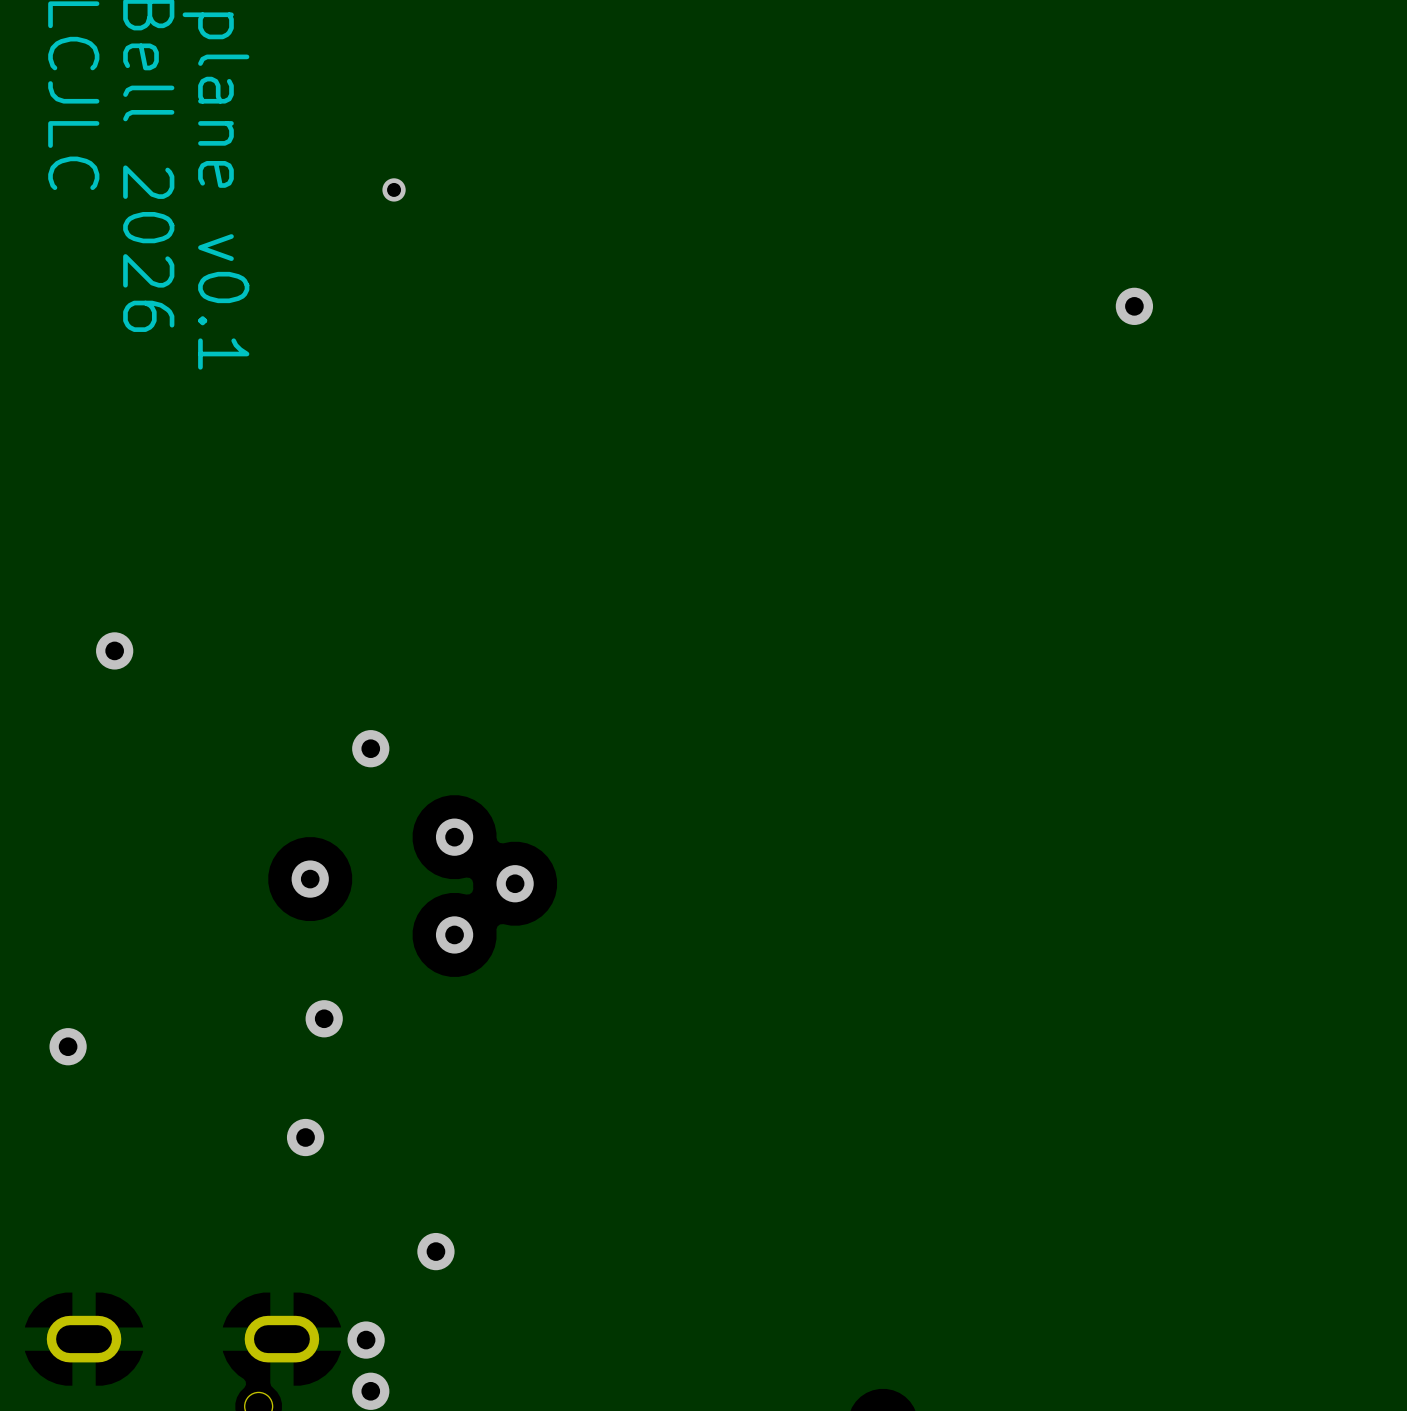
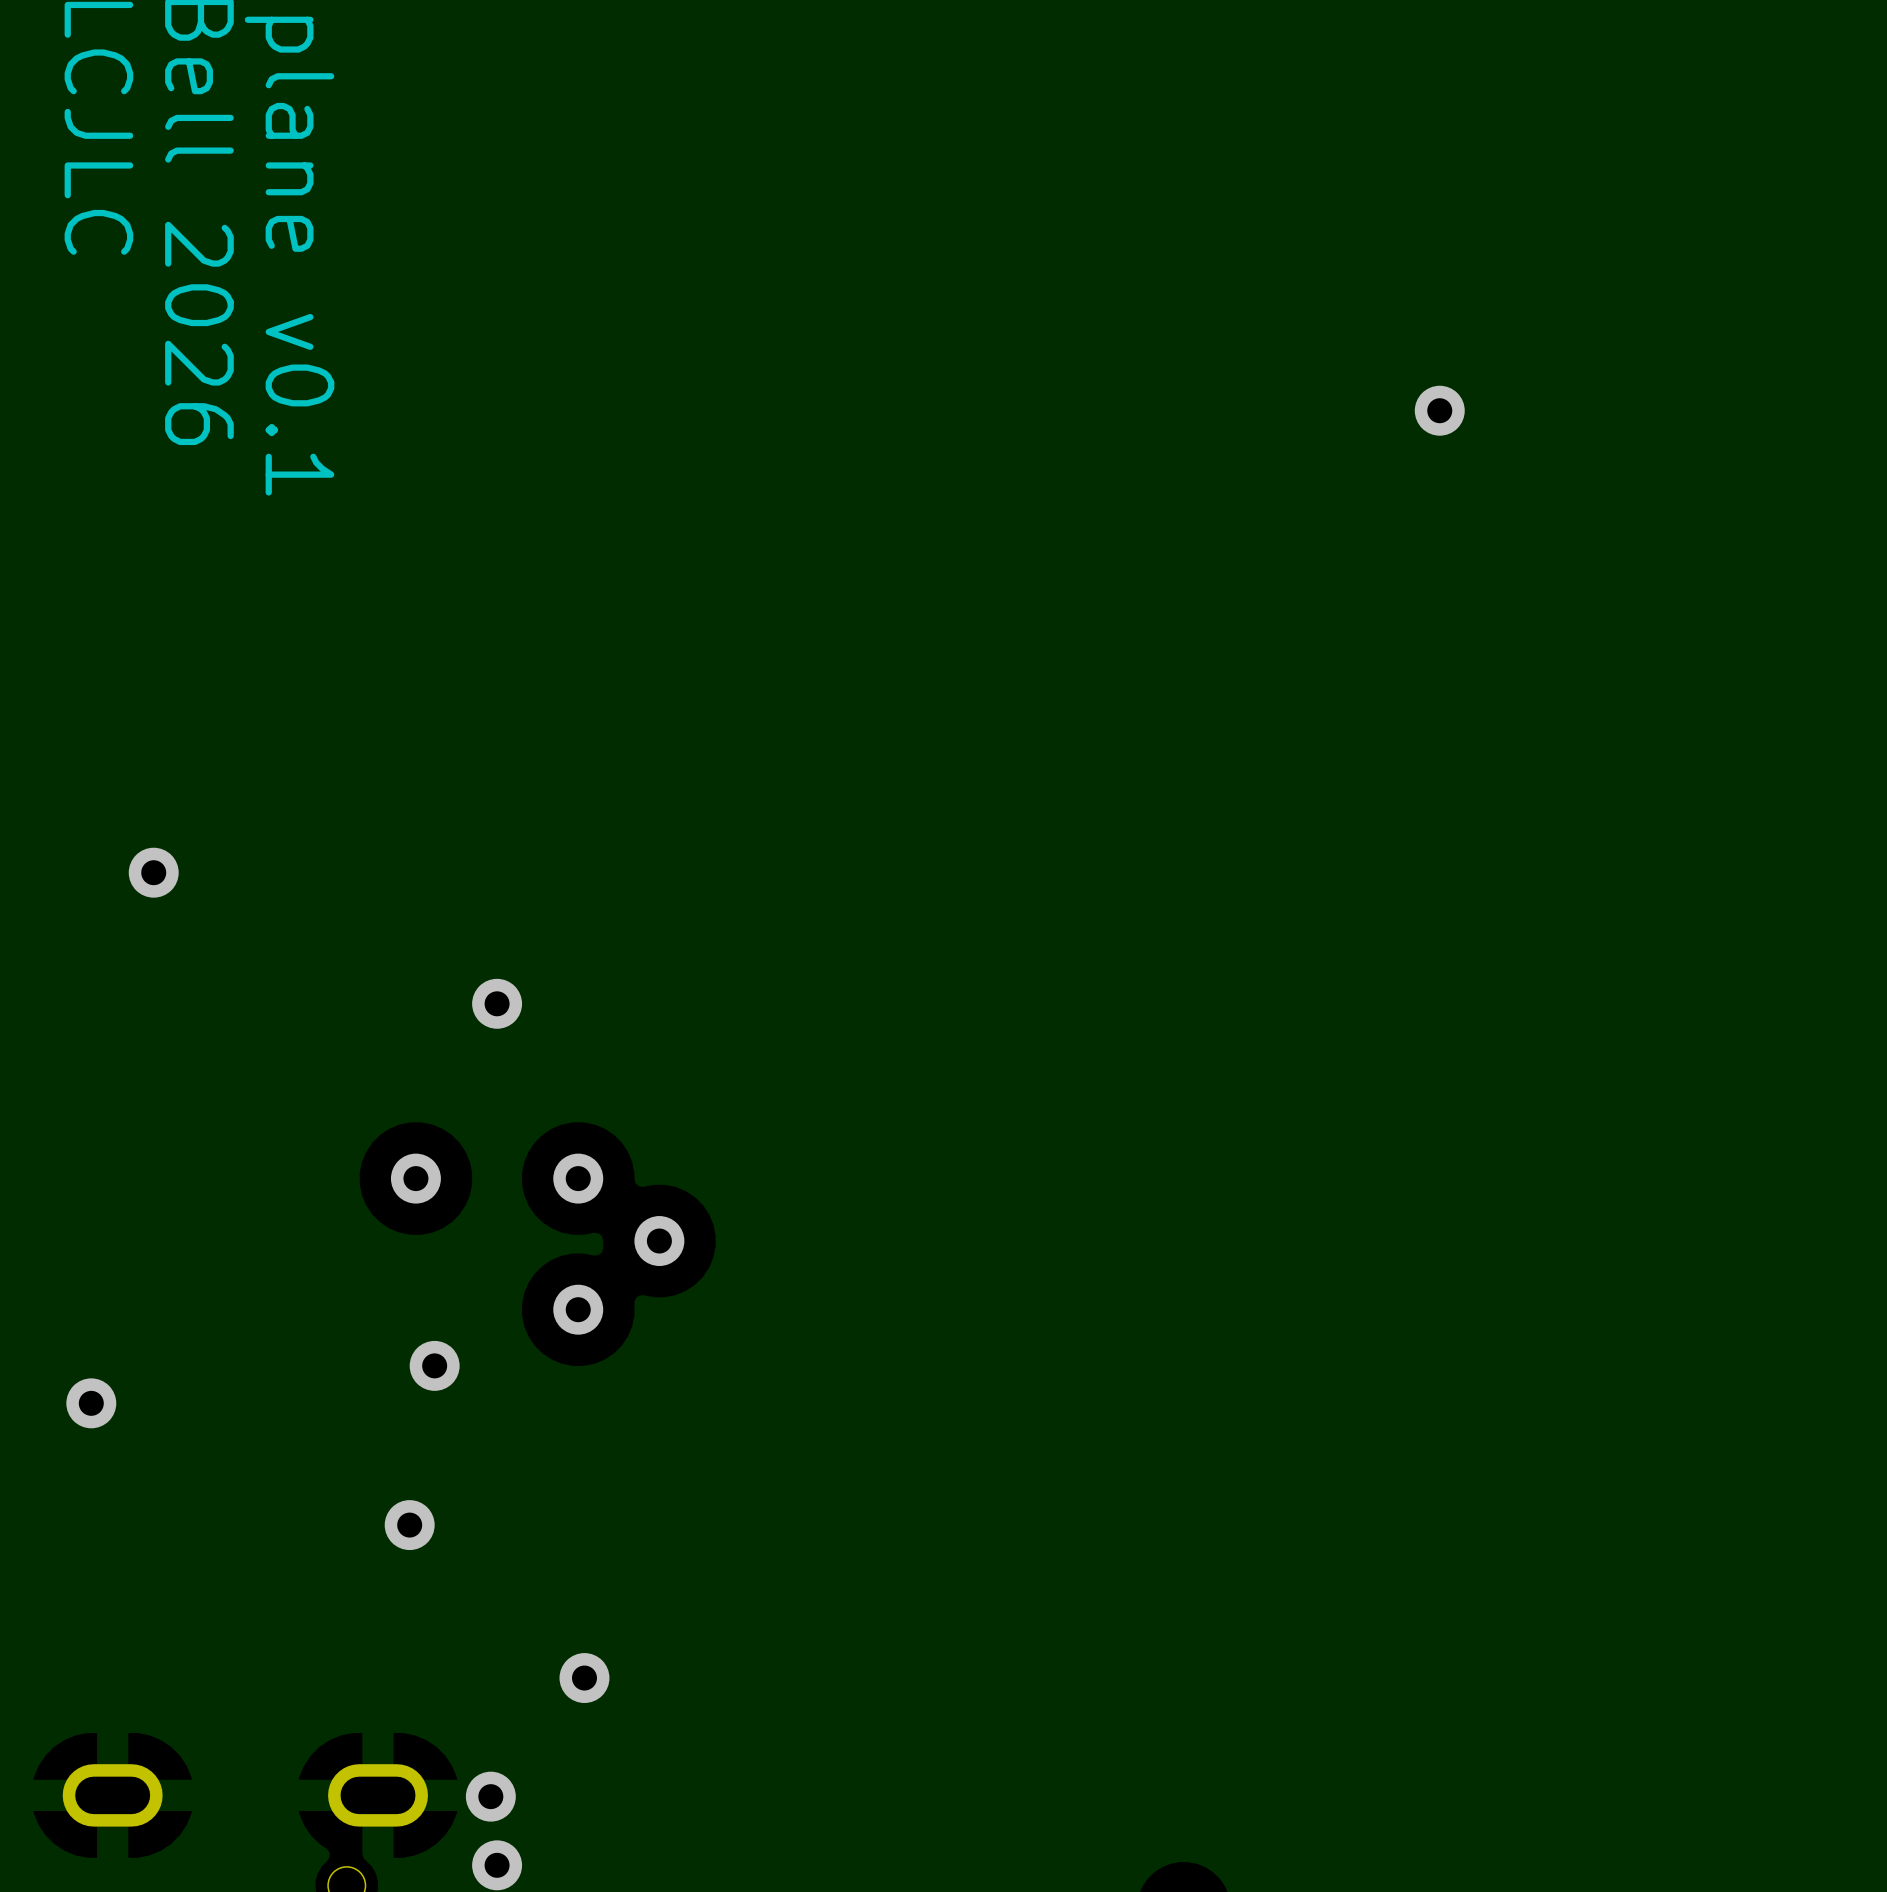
via: (394, 189) -> none
via position: (1134, 306) -> (1439, 410)
via: (454, 837) -> none
via: none -> (578, 1178)
via: (515, 883) -> none
via position: (454, 934) -> (659, 1241)
via: none -> (578, 1309)

